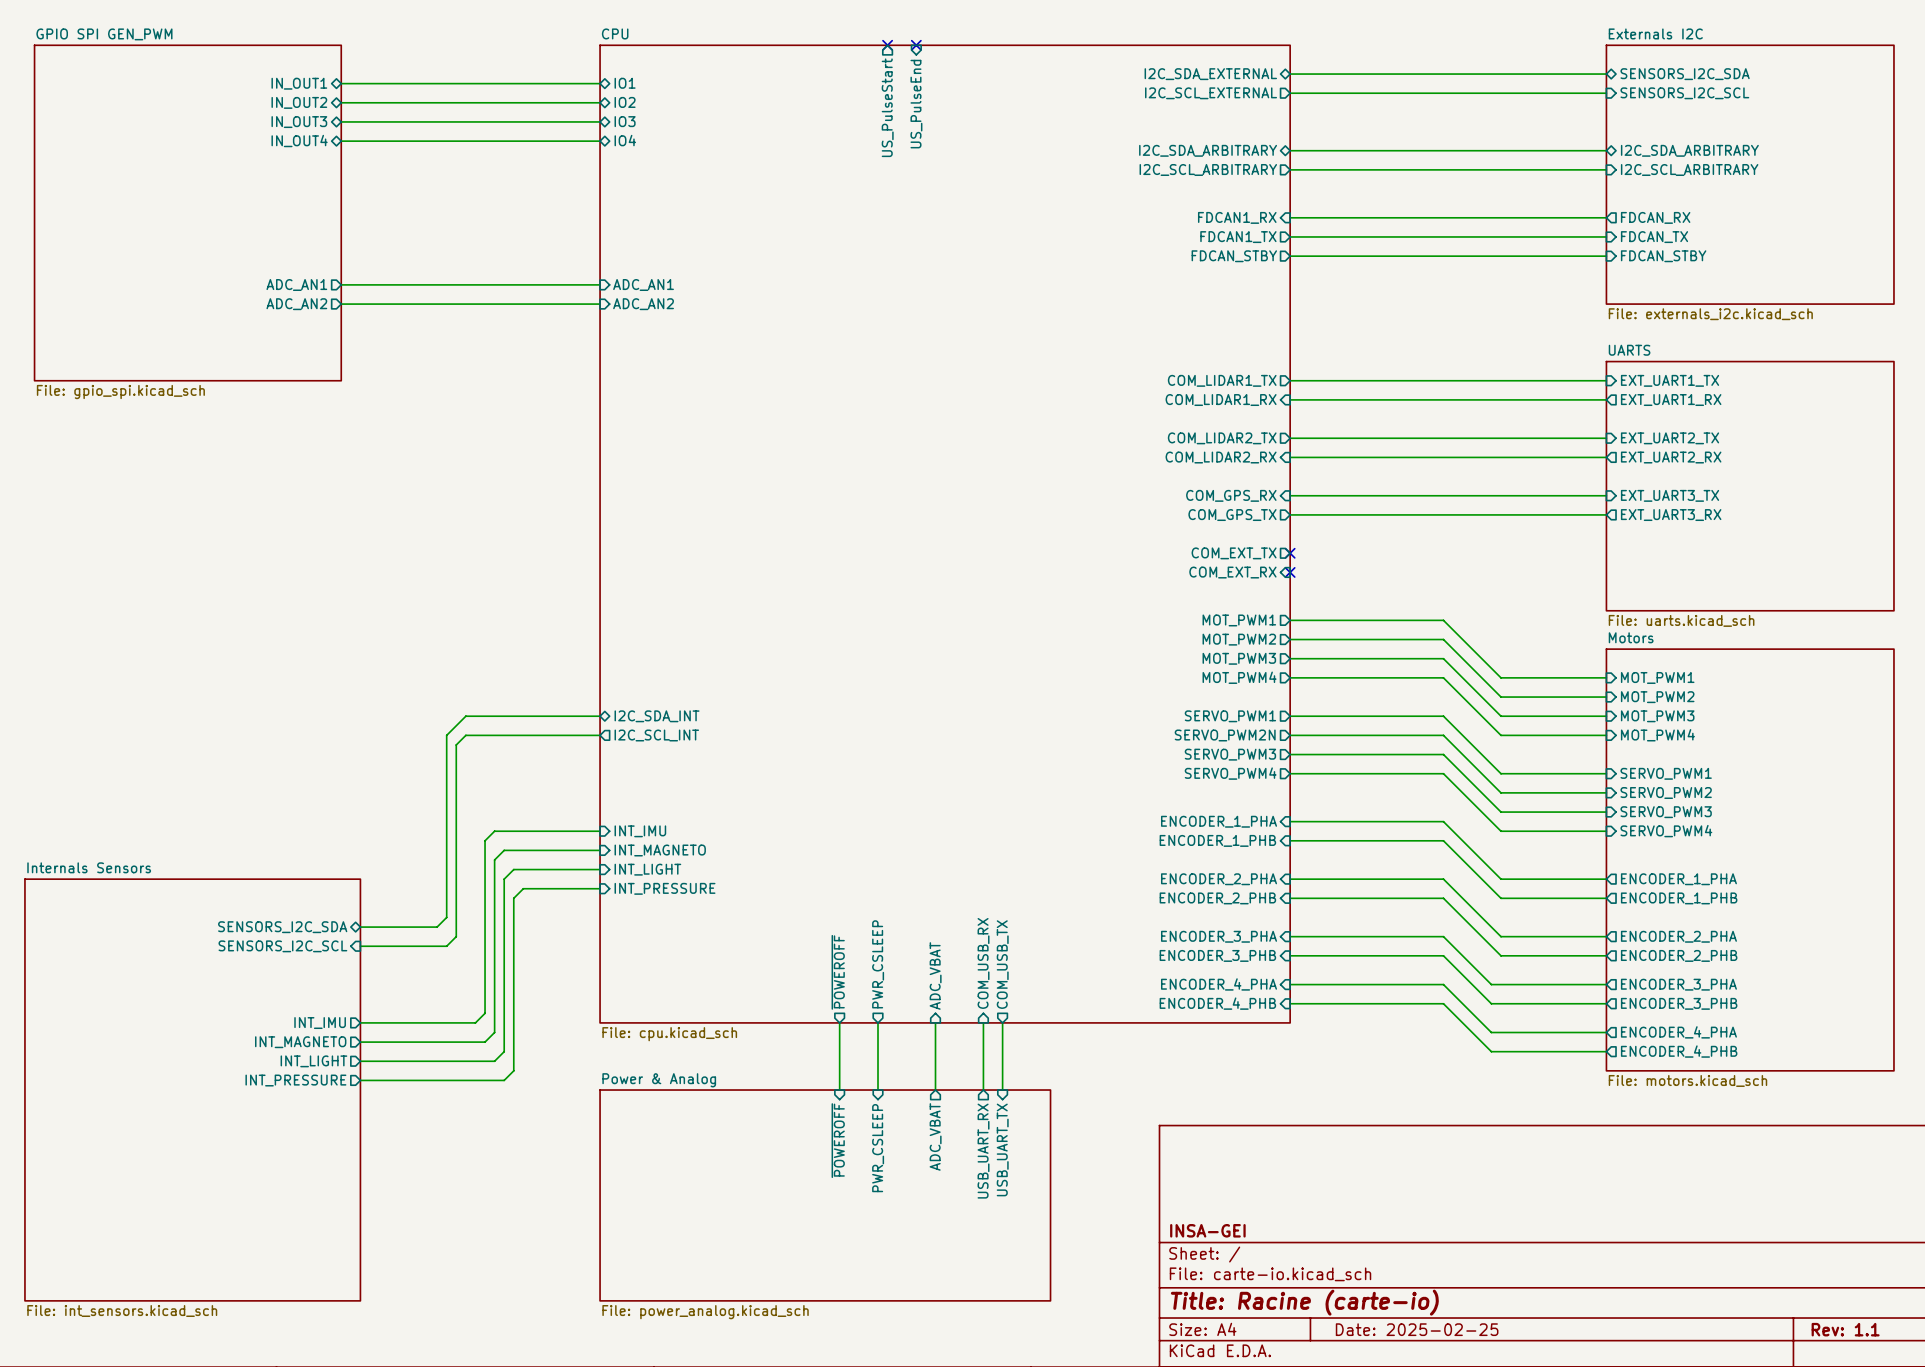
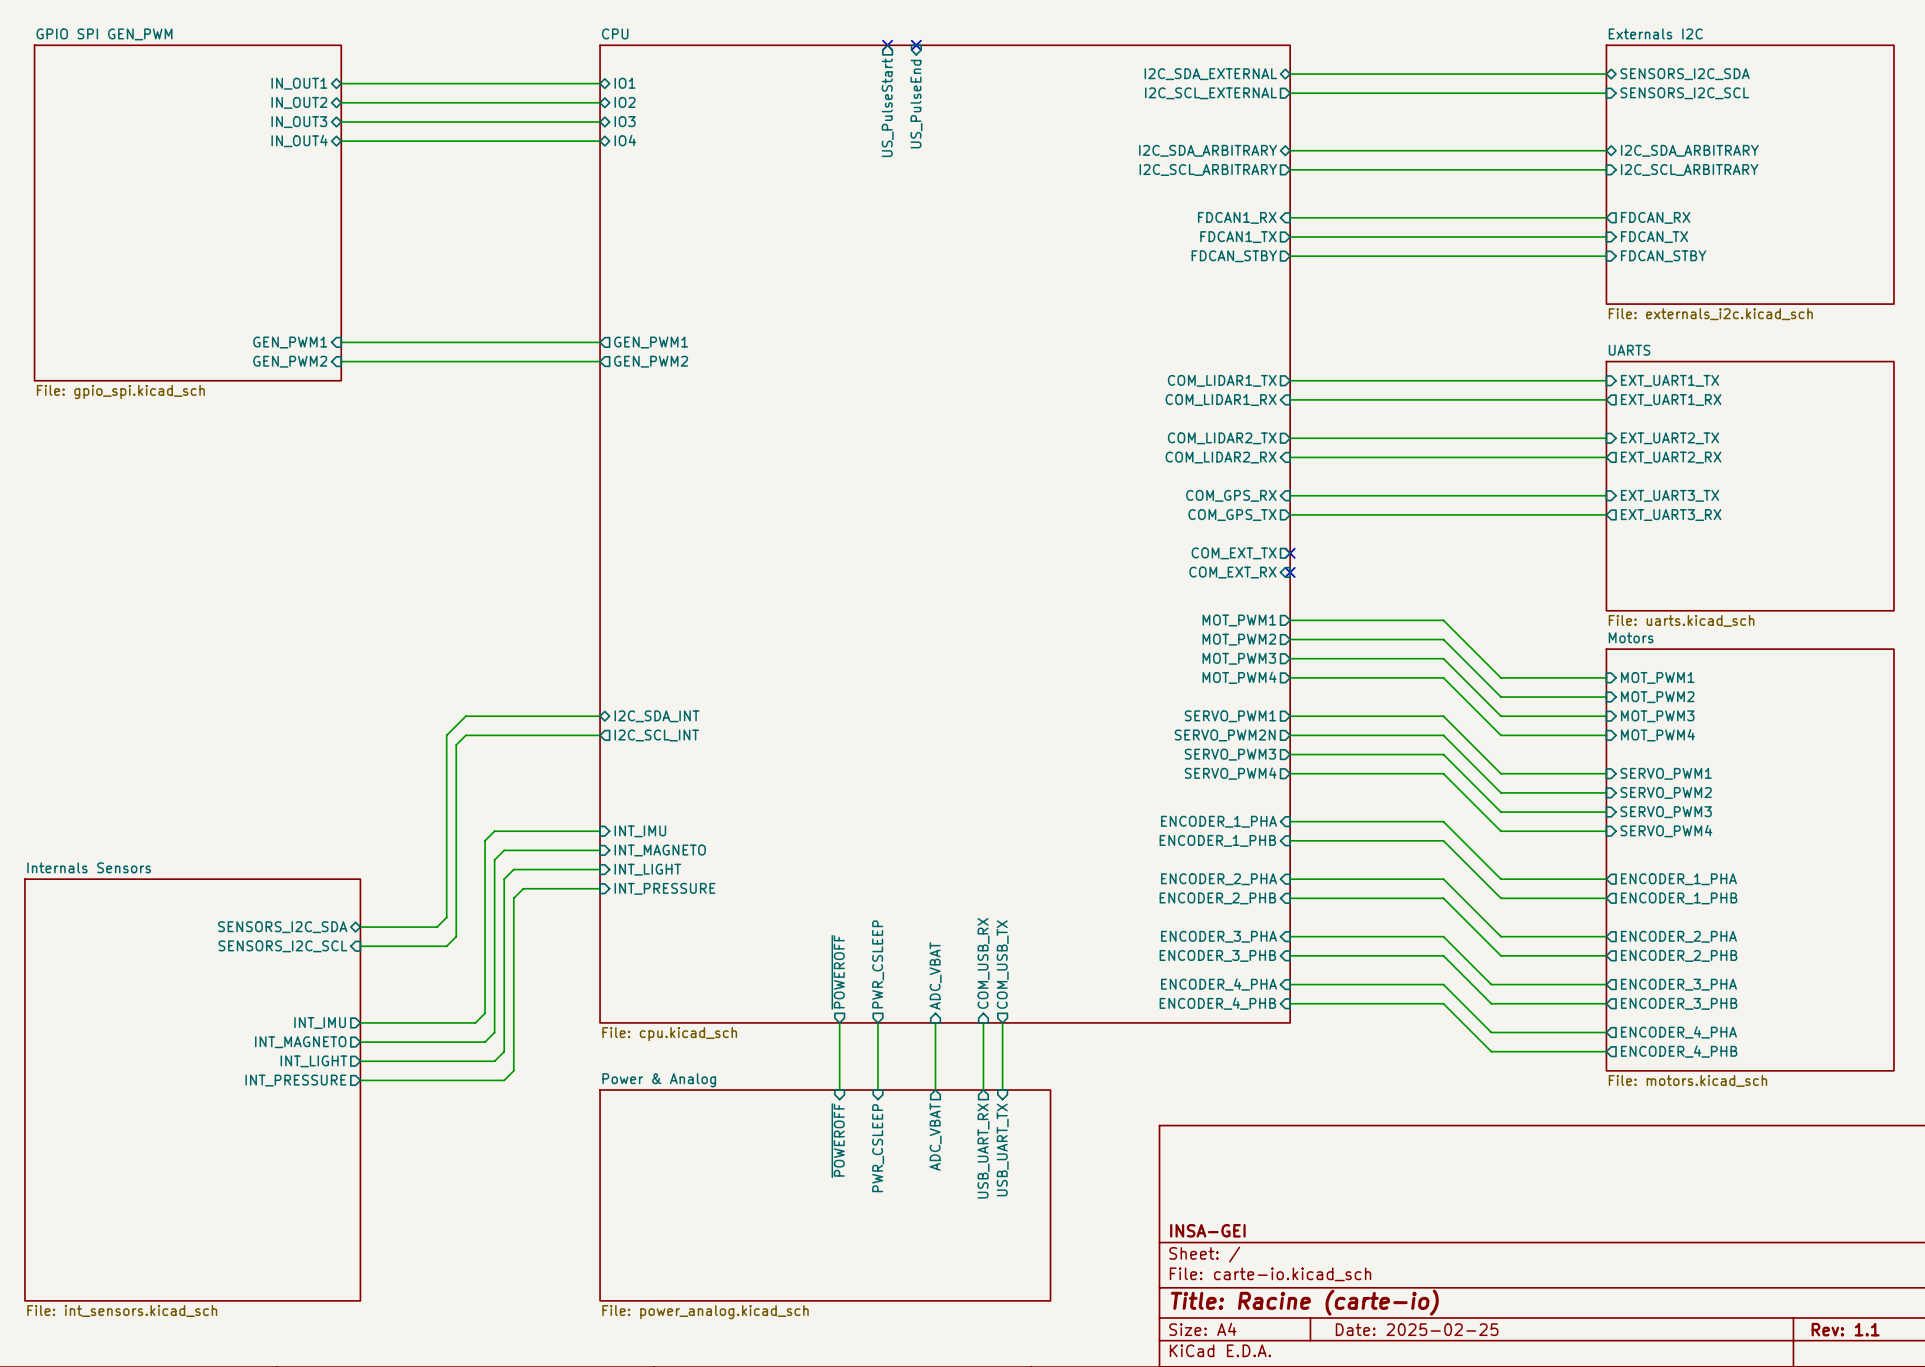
wire: (341, 284) (600, 284) -> (341, 361) (600, 361)
sheet pin: ADC_AN1 (296, 285) -> none
sheet pin: ADC_AN1 (643, 285) -> none
sheet pin: ADC_AN2 (296, 304) -> none
wire: (341, 304) (600, 304) -> (341, 342) (600, 342)
sheet pin: ADC_AN2 (643, 304) -> none
sheet pin: none -> GEN_PWM1 (290, 342)
sheet pin: none -> GEN_PWM1 (651, 342)
sheet pin: none -> GEN_PWM2 (290, 361)
sheet pin: none -> GEN_PWM2 (651, 361)

